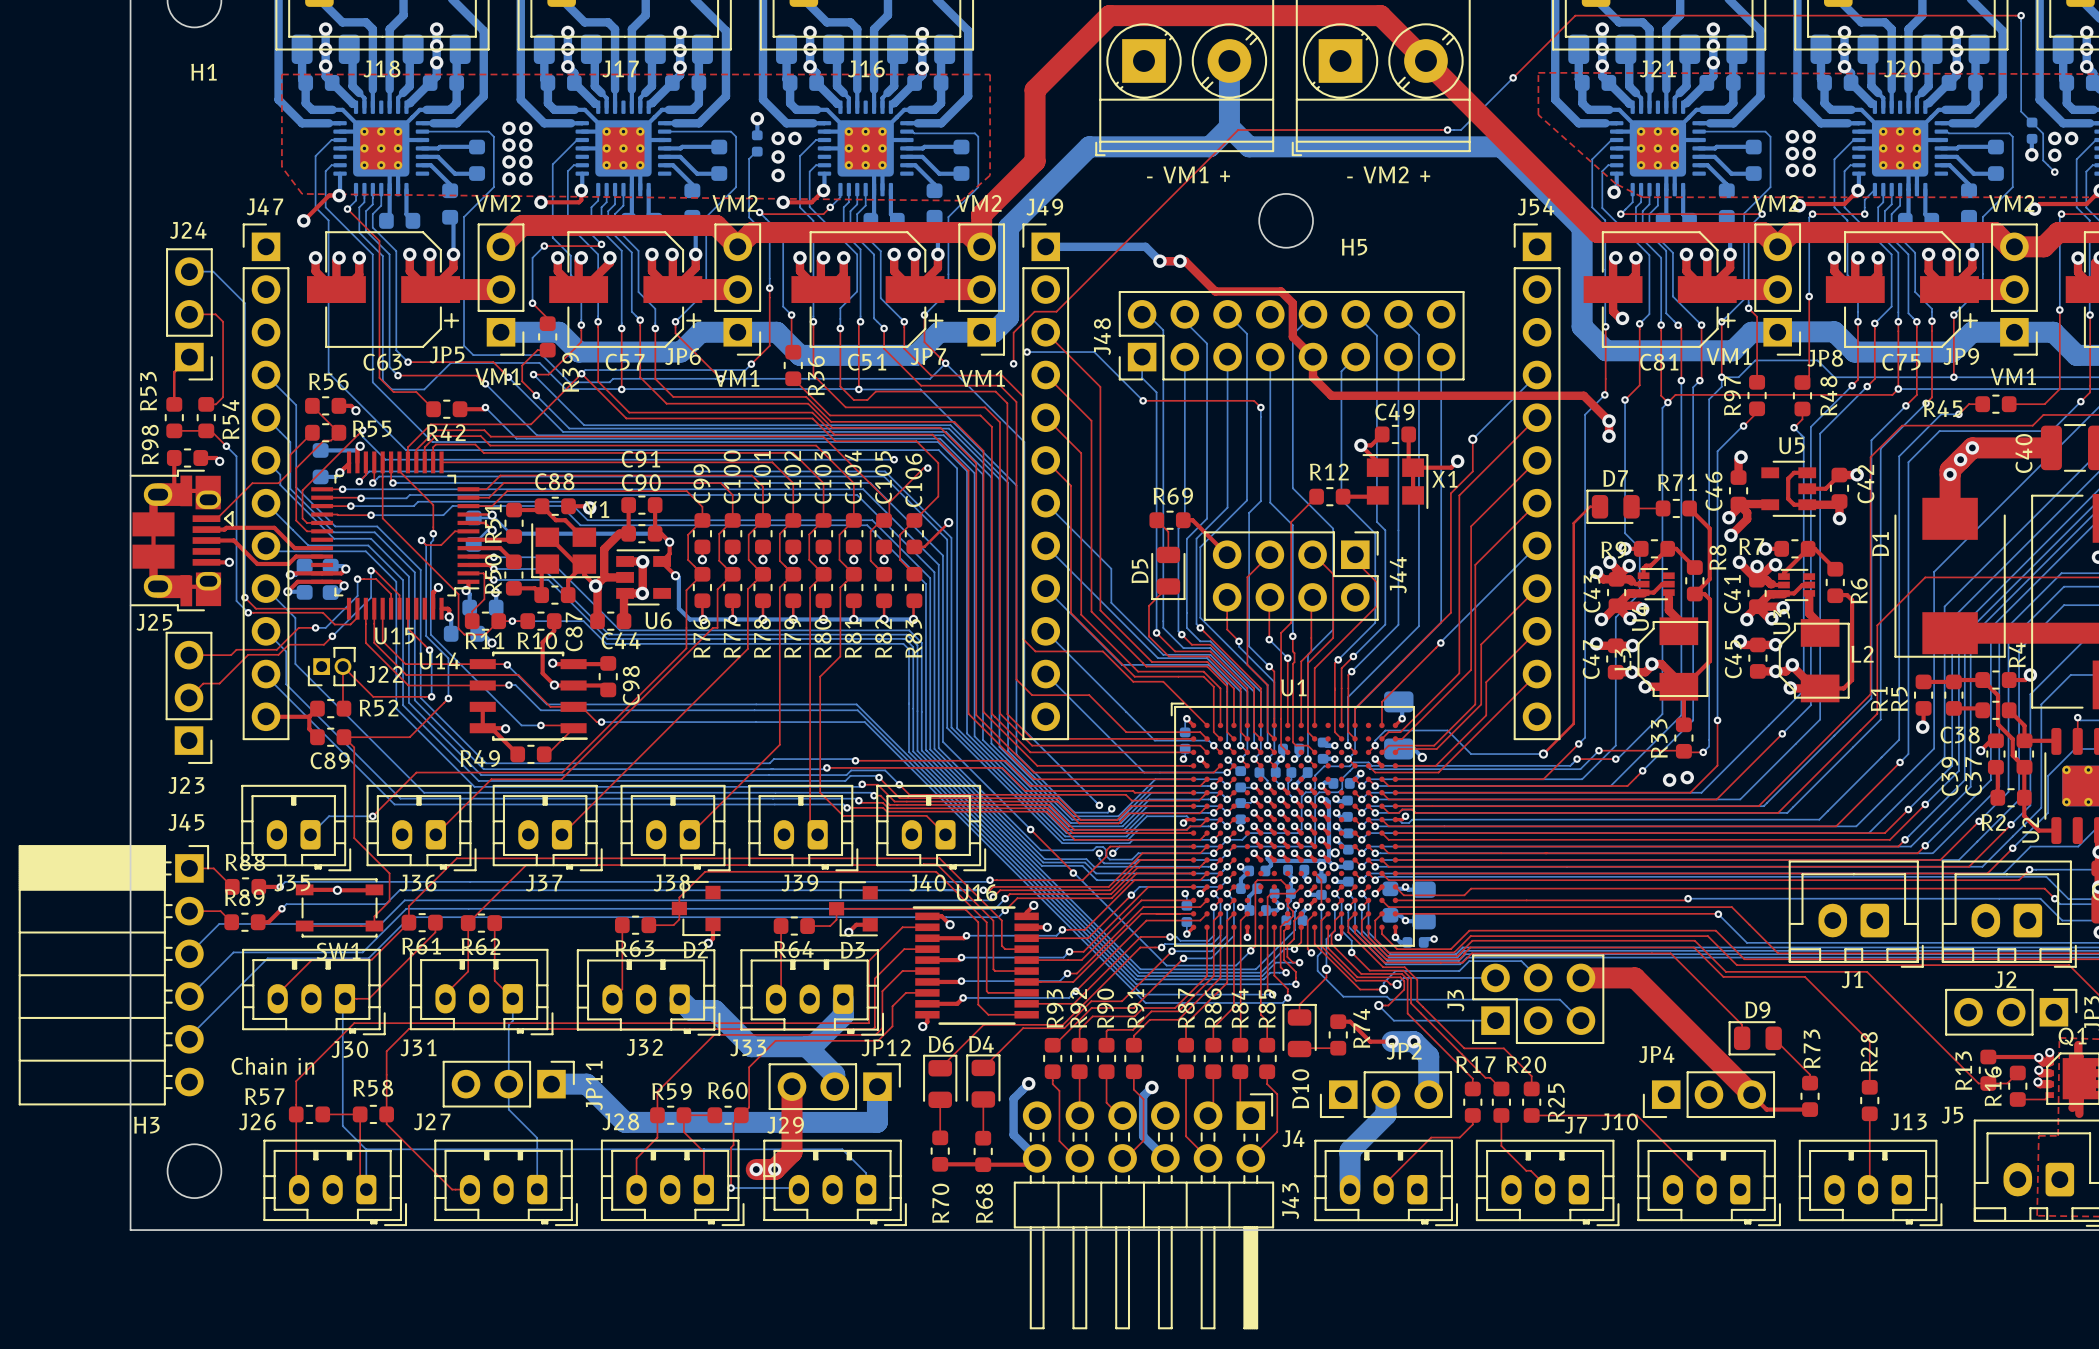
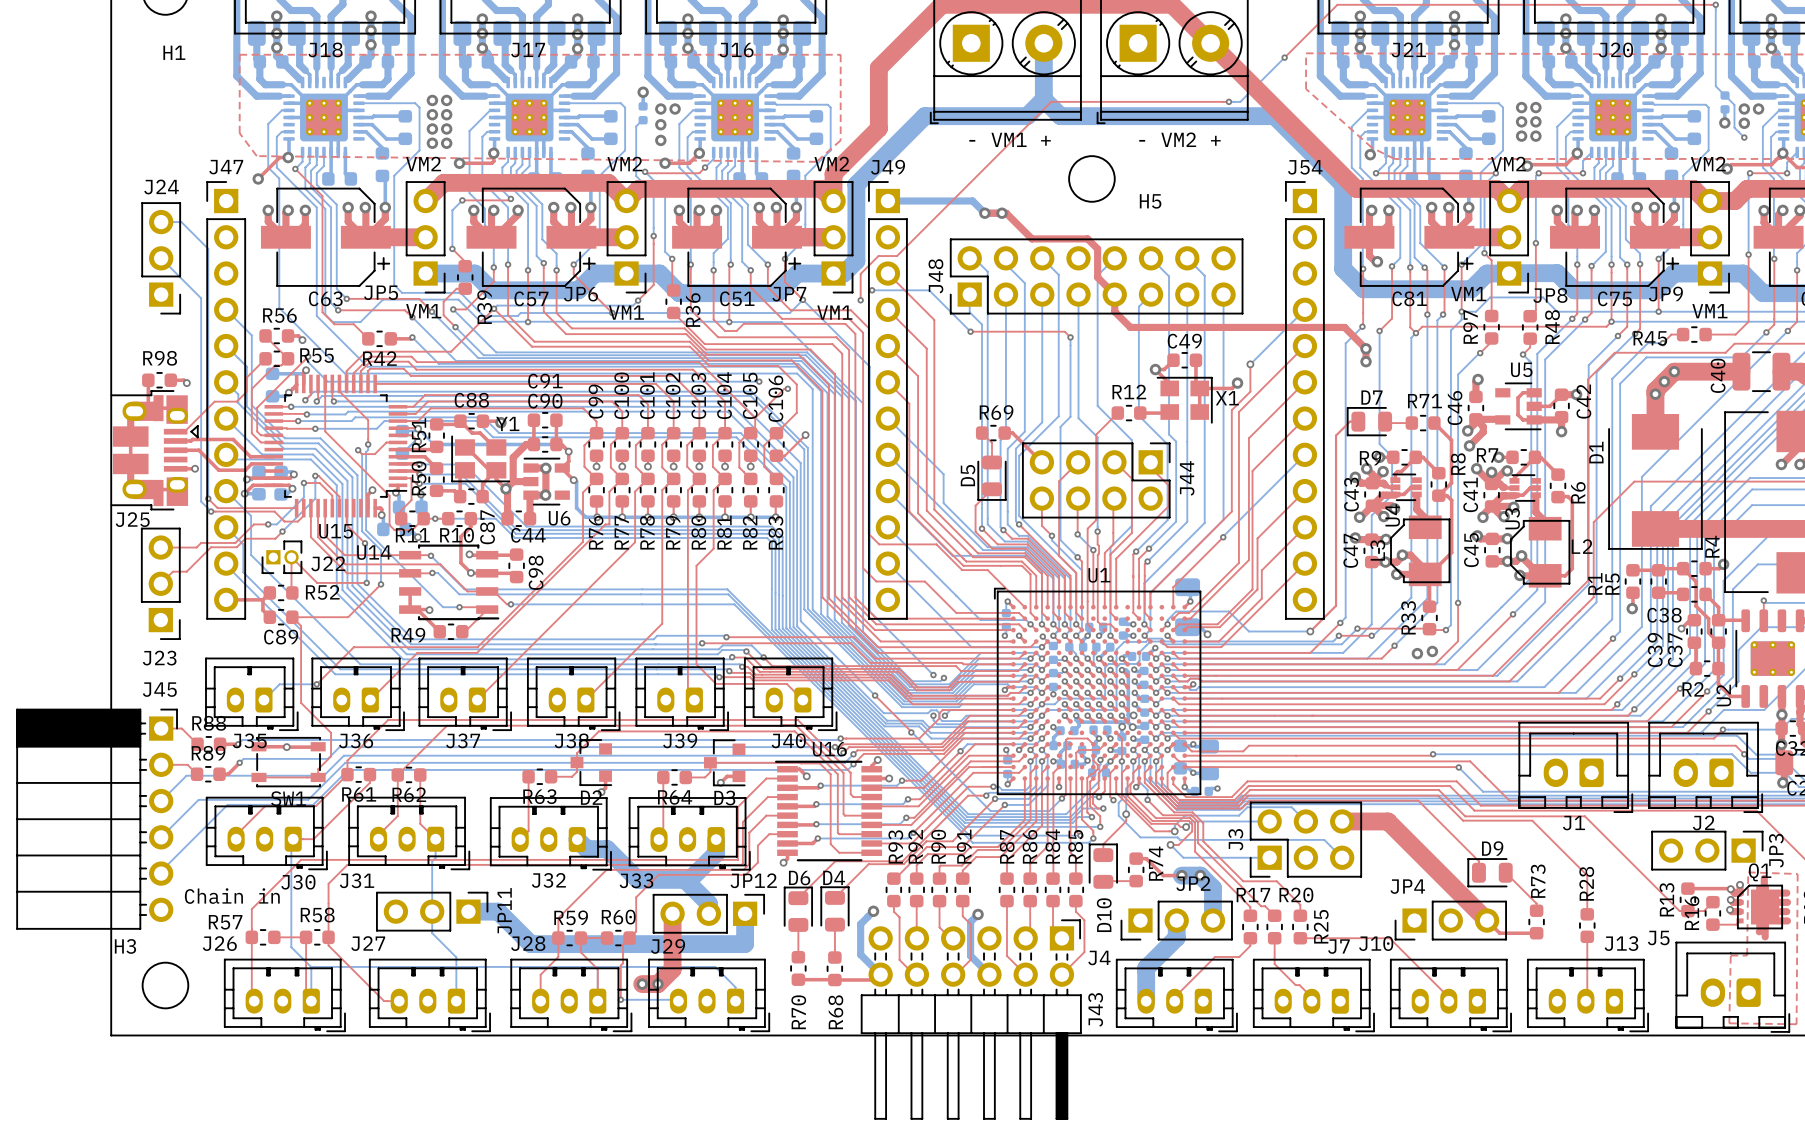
top track: (189, 314) (215, 314) (223, 321) (223, 397) (215, 404) (206, 404) -> none
top track: (189, 357) (174, 372) (174, 404) -> none
R53: (174, 417) -> none
R54: (206, 417) -> none
top track: (174, 430) (211, 430) (226, 446) -> none
R98 name rotation: 0° (150, 444) -> 90° clockwise (160, 358)
bottom track: (226, 446) (236, 456) -> (161, 258) (201, 298) (201, 378)
via: (226, 446) -> none

